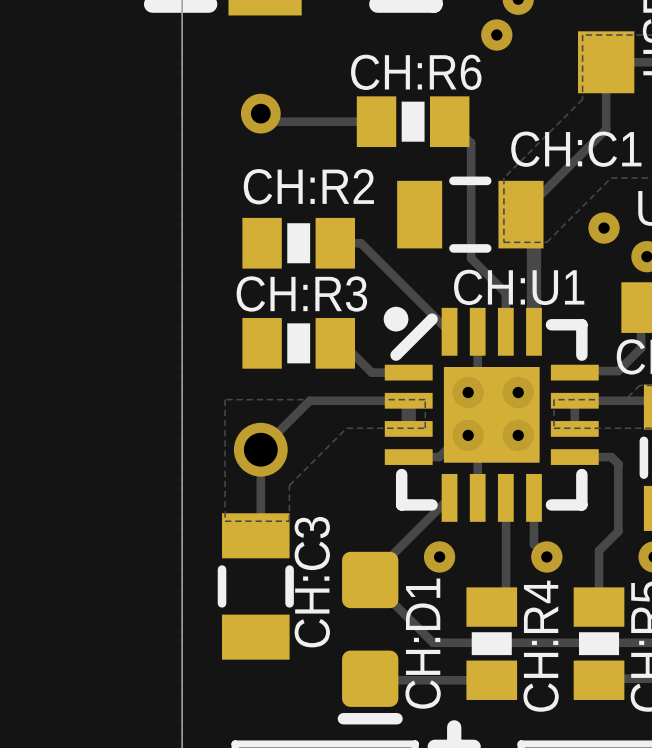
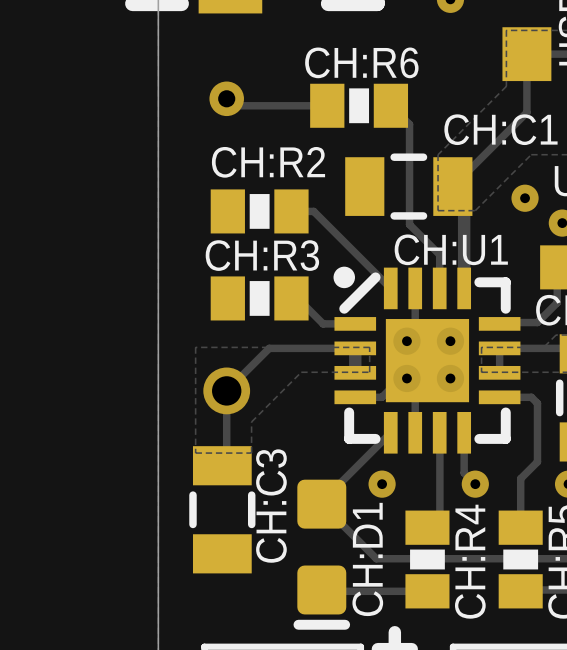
via: (496, 34) -> none

